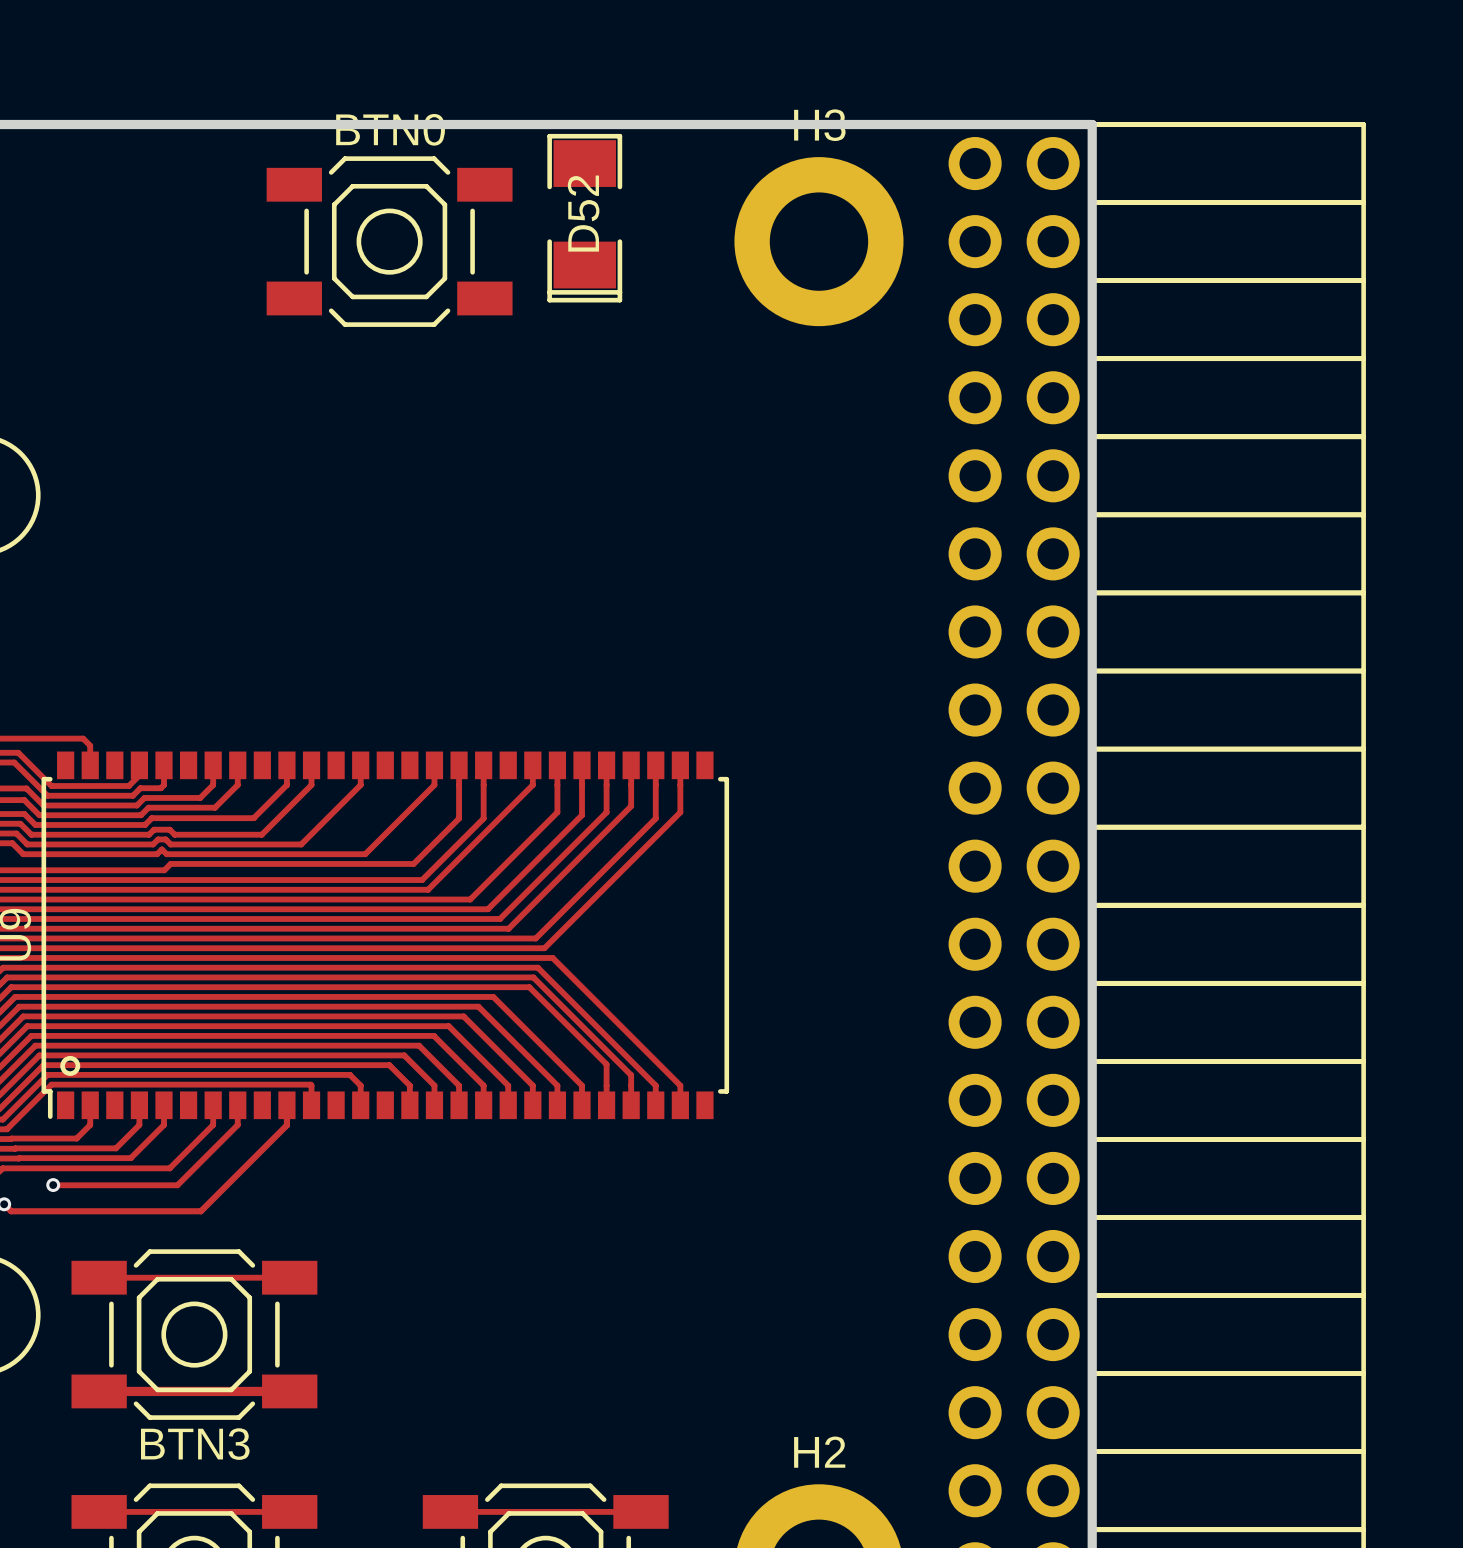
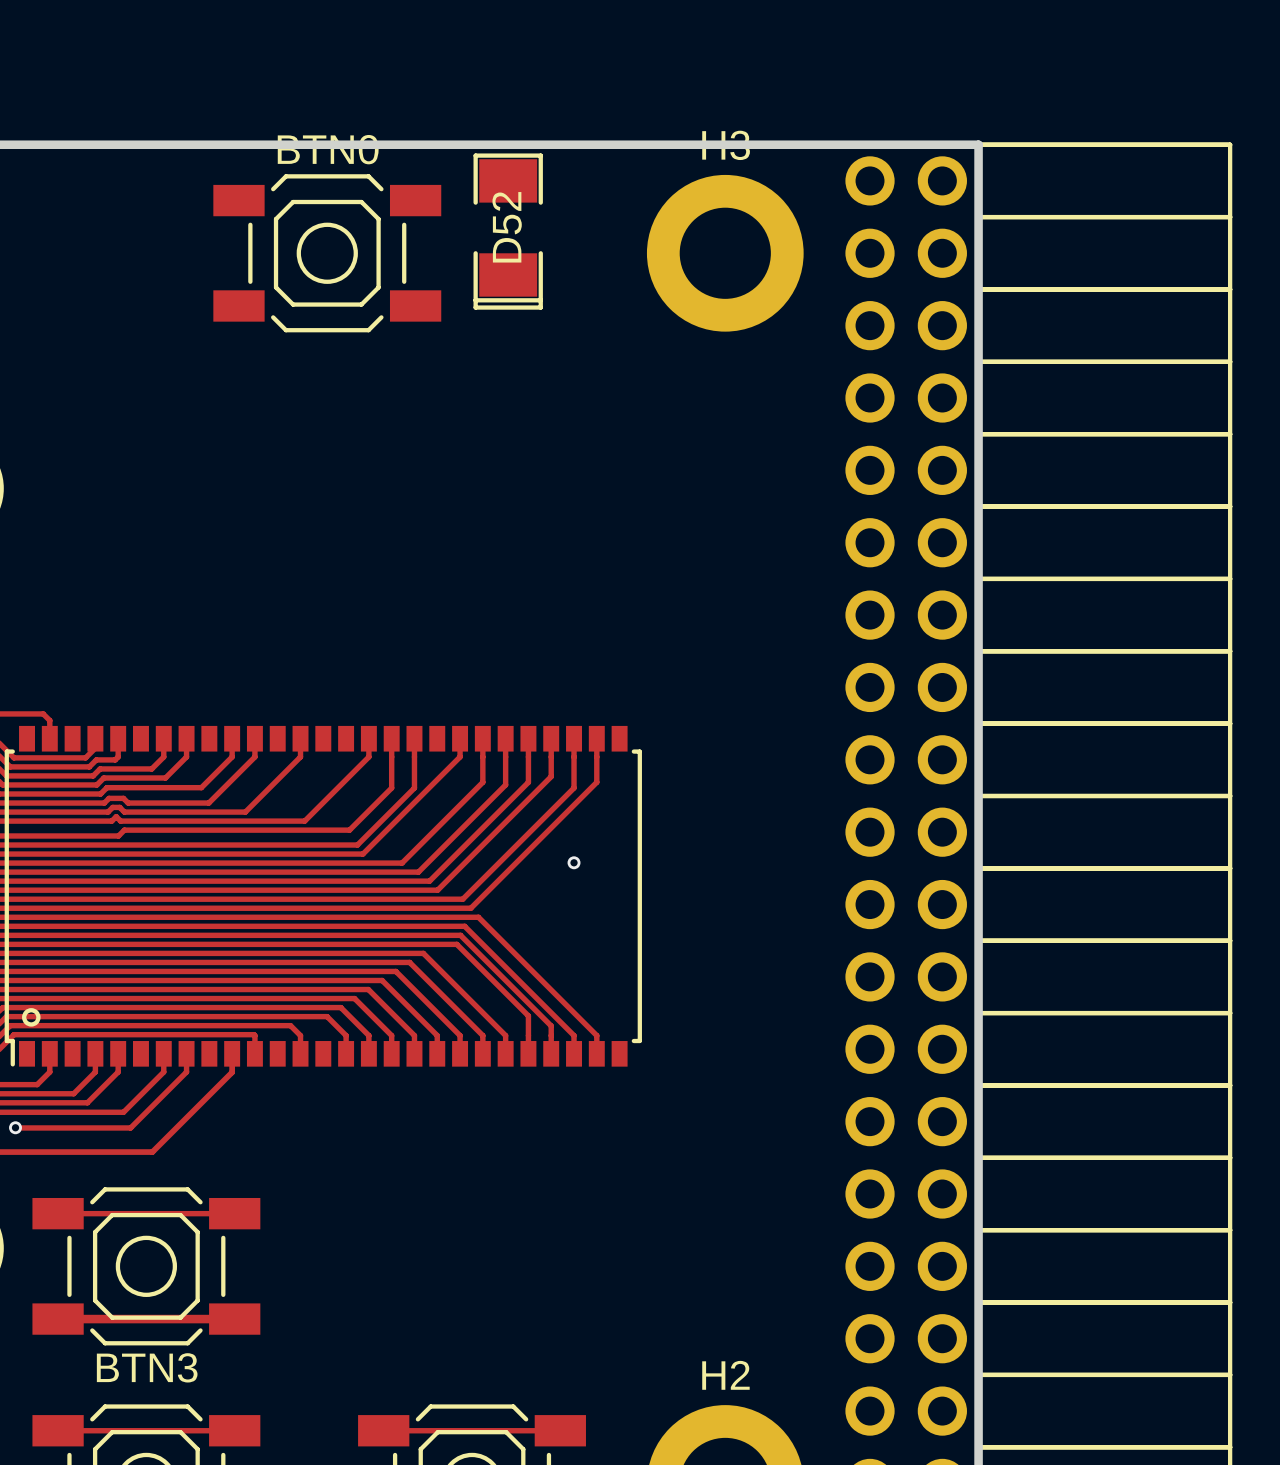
via: none -> (574, 862)

